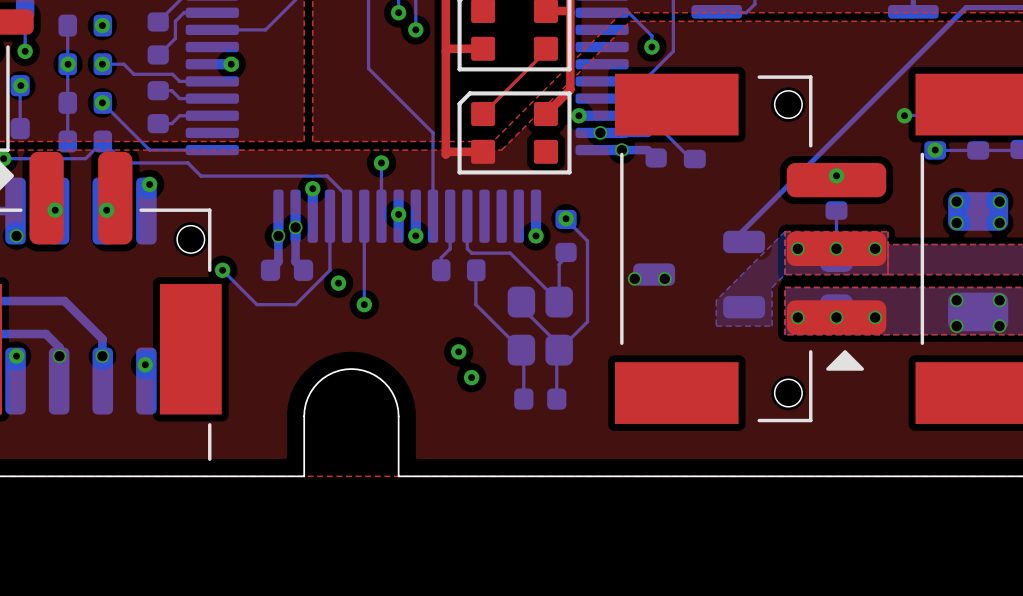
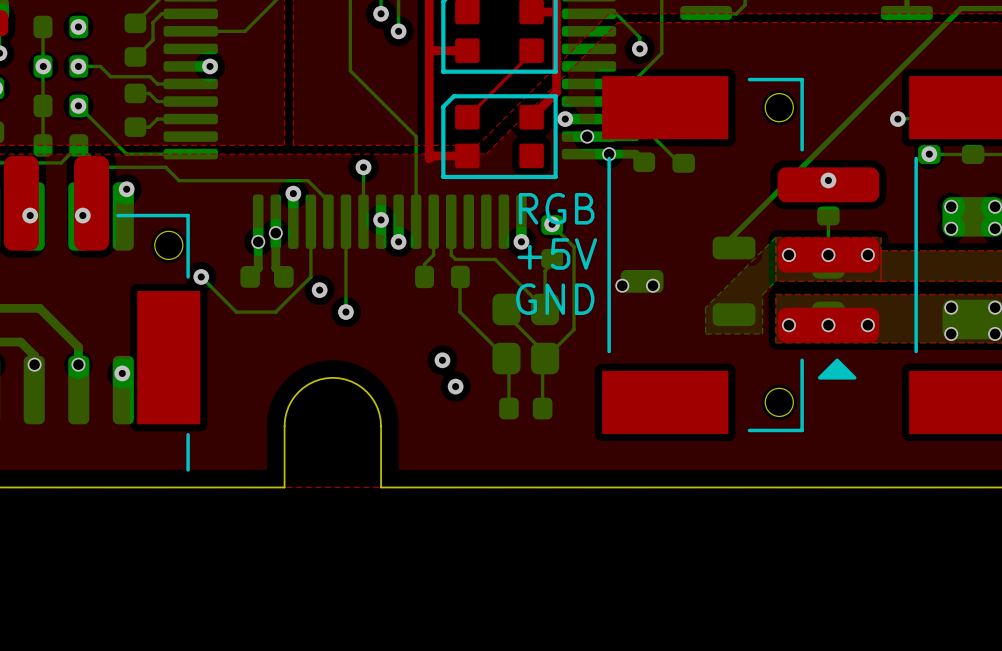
text: none -> RGB (556, 208)
text: none -> +5V (557, 253)
text: none -> GND (555, 299)

